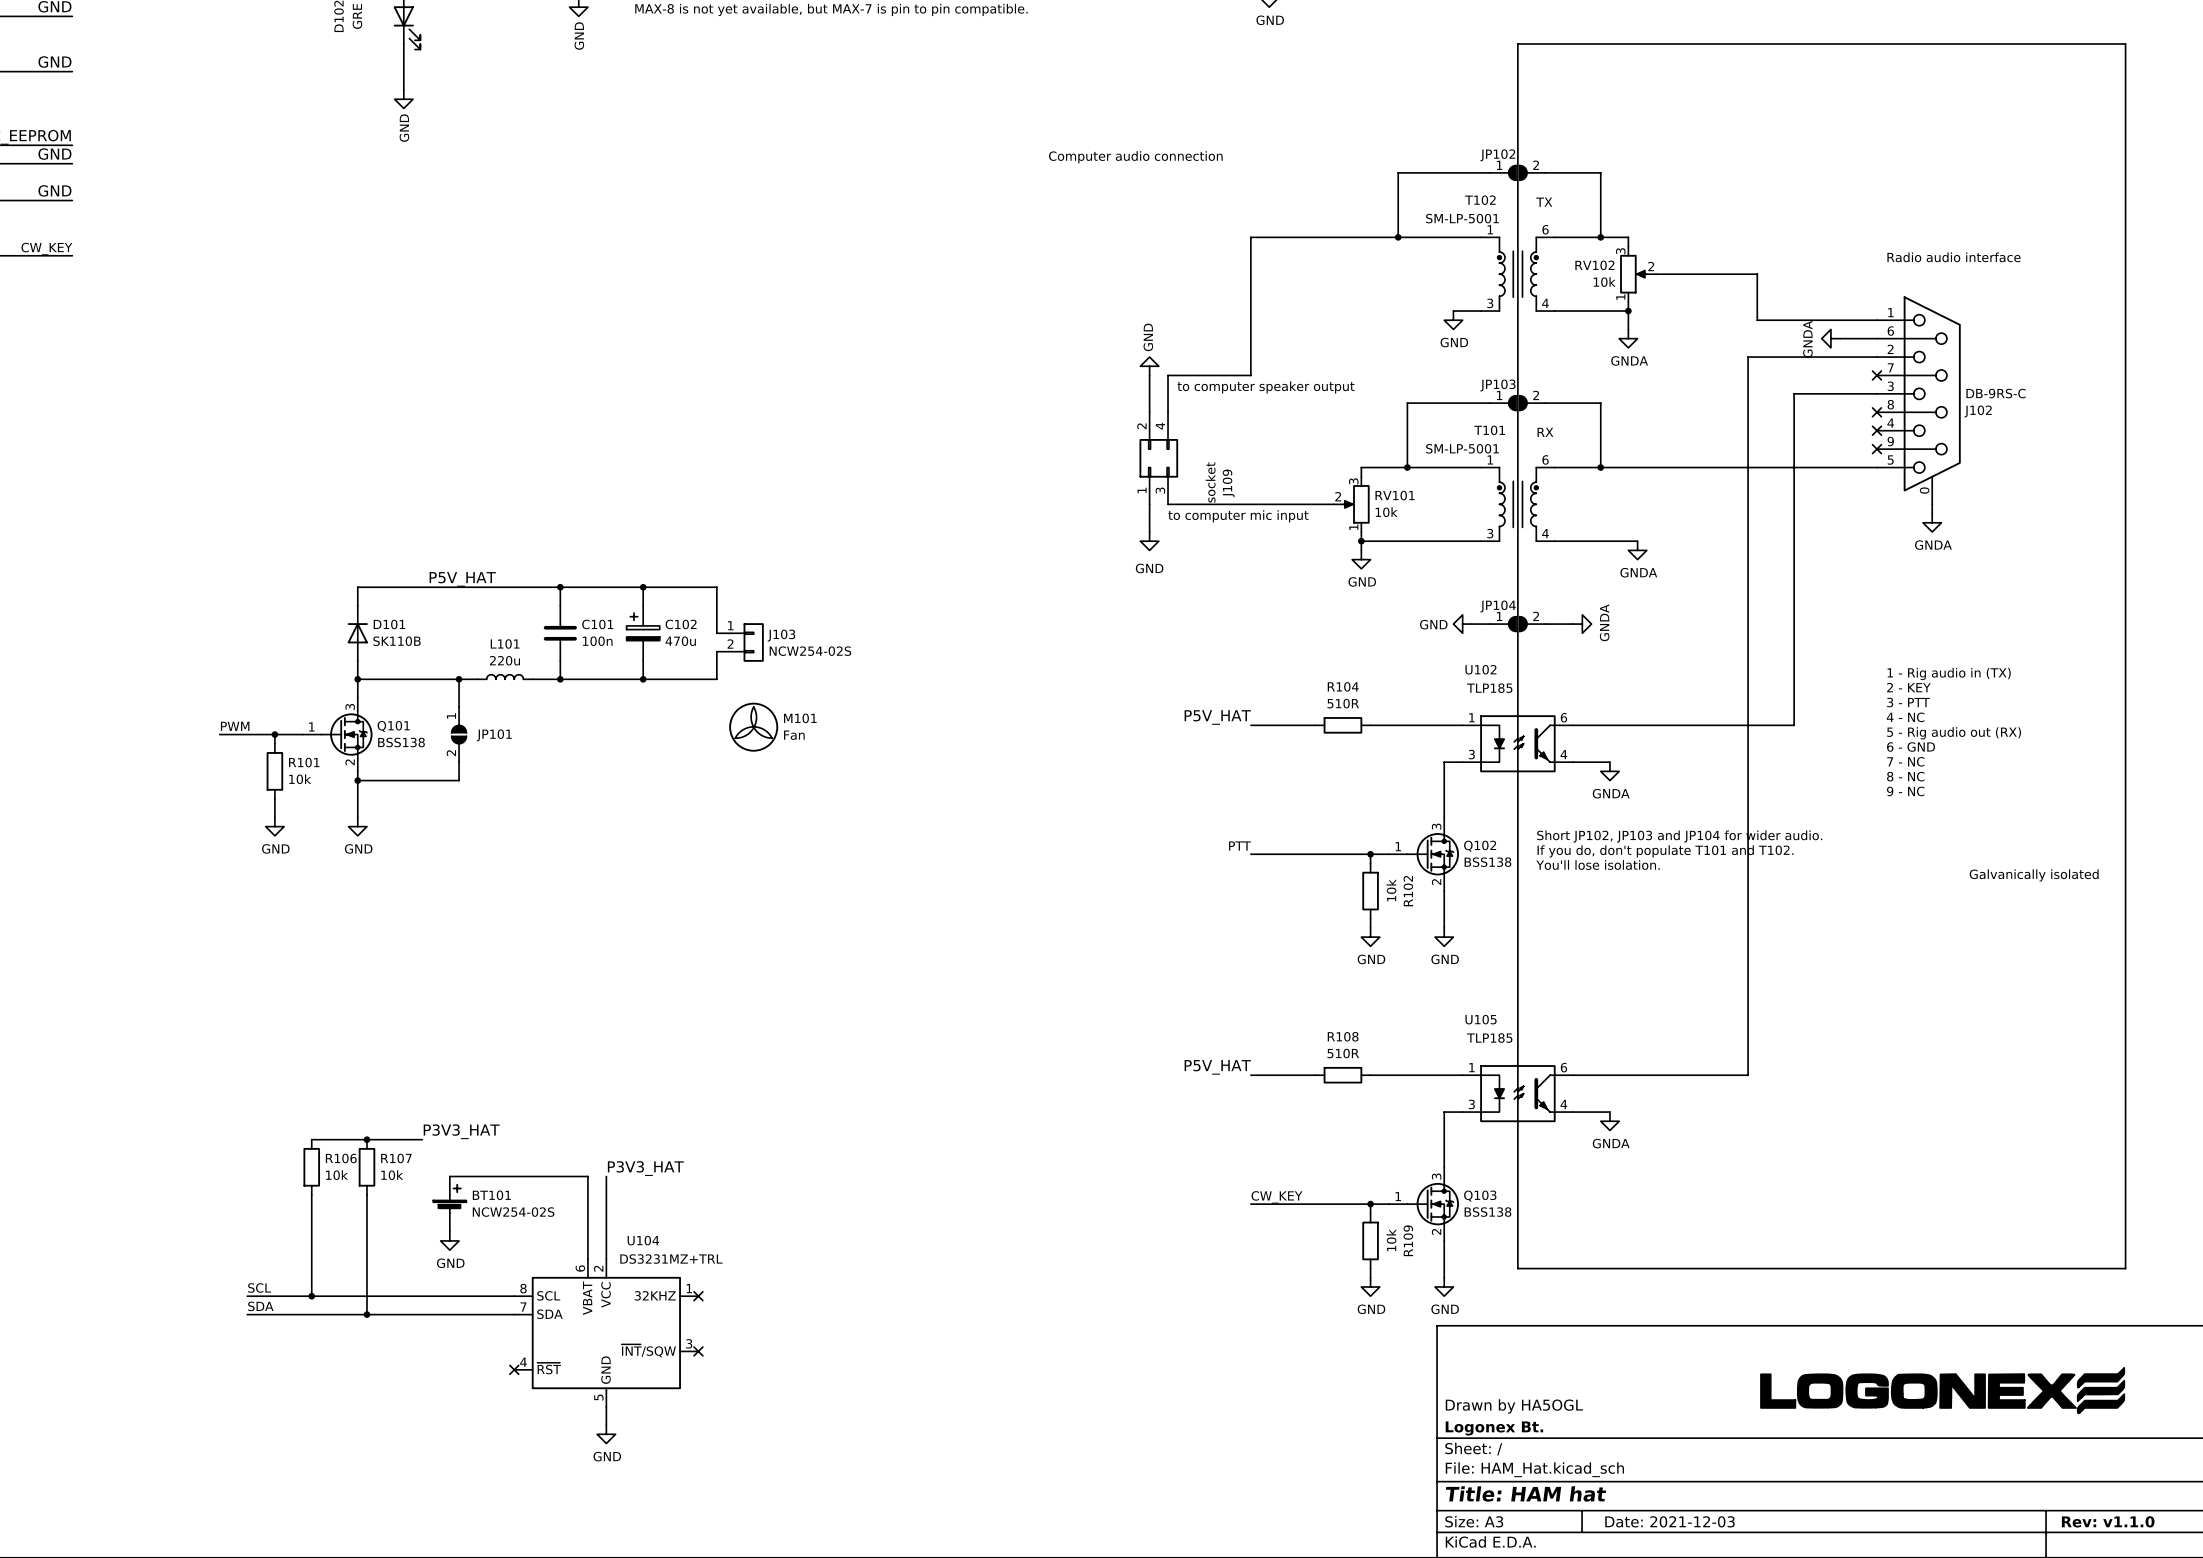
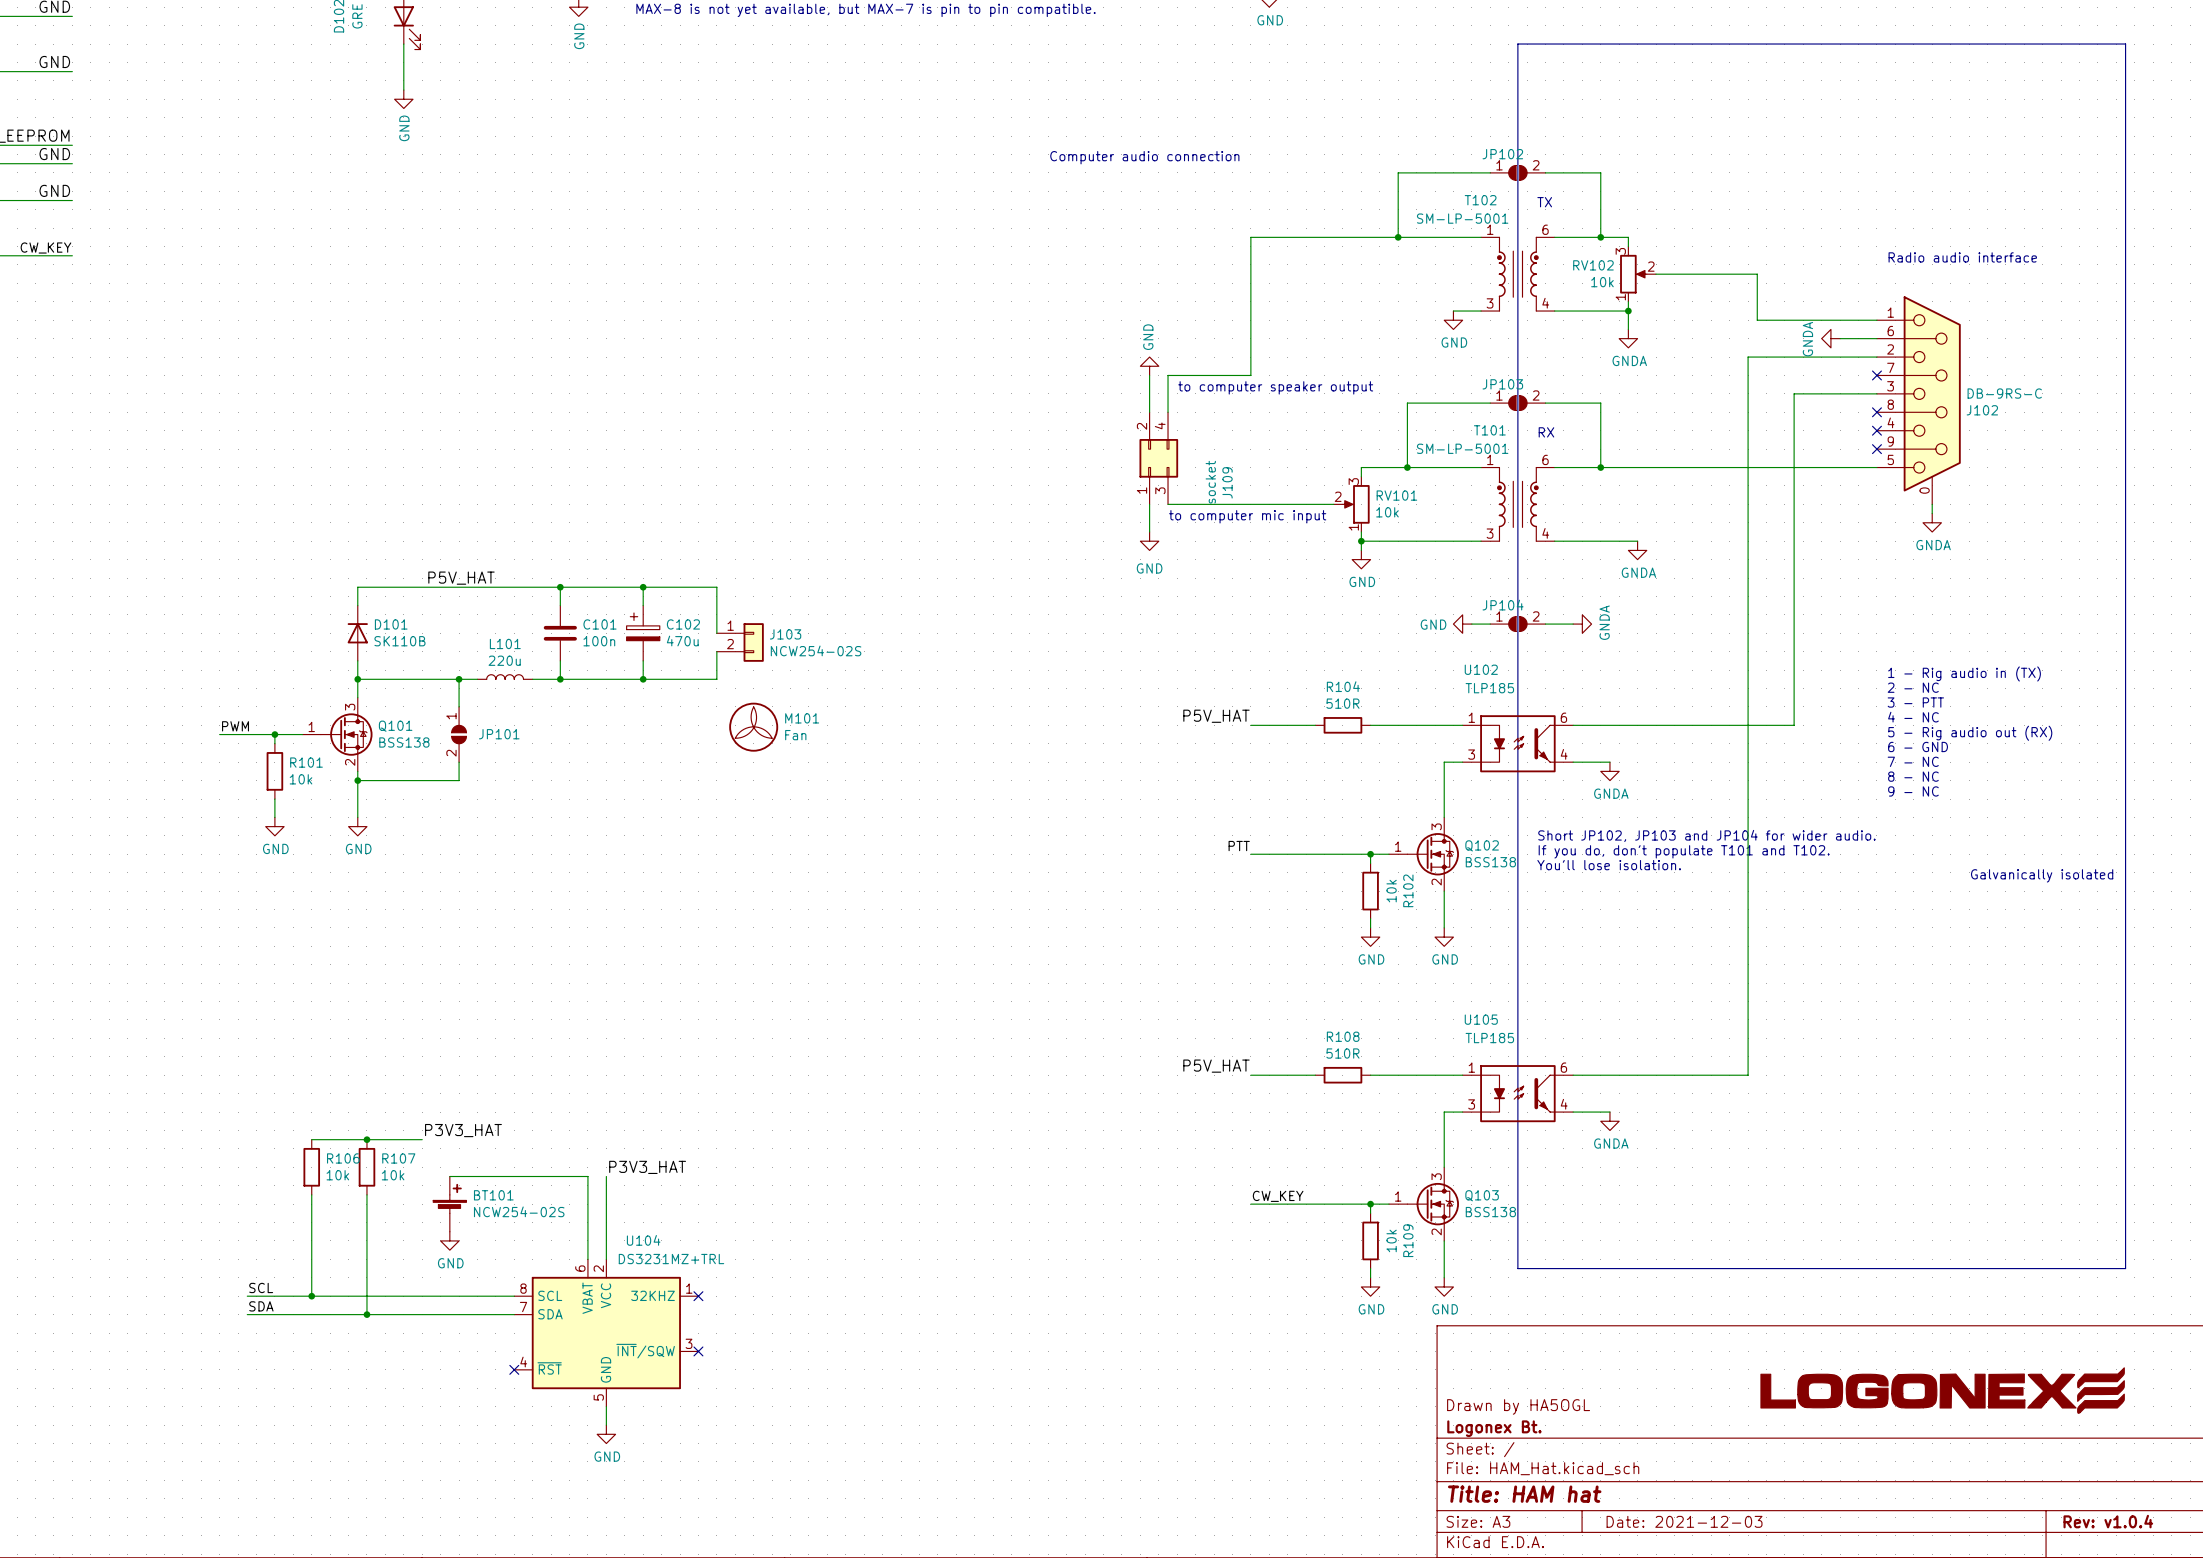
text: 2 - KEY (1908, 687) -> 2 - NC (1913, 687)
title block: Rev: v1.1.0 (2108, 1521) -> Rev: v1.0.4 (2108, 1521)

